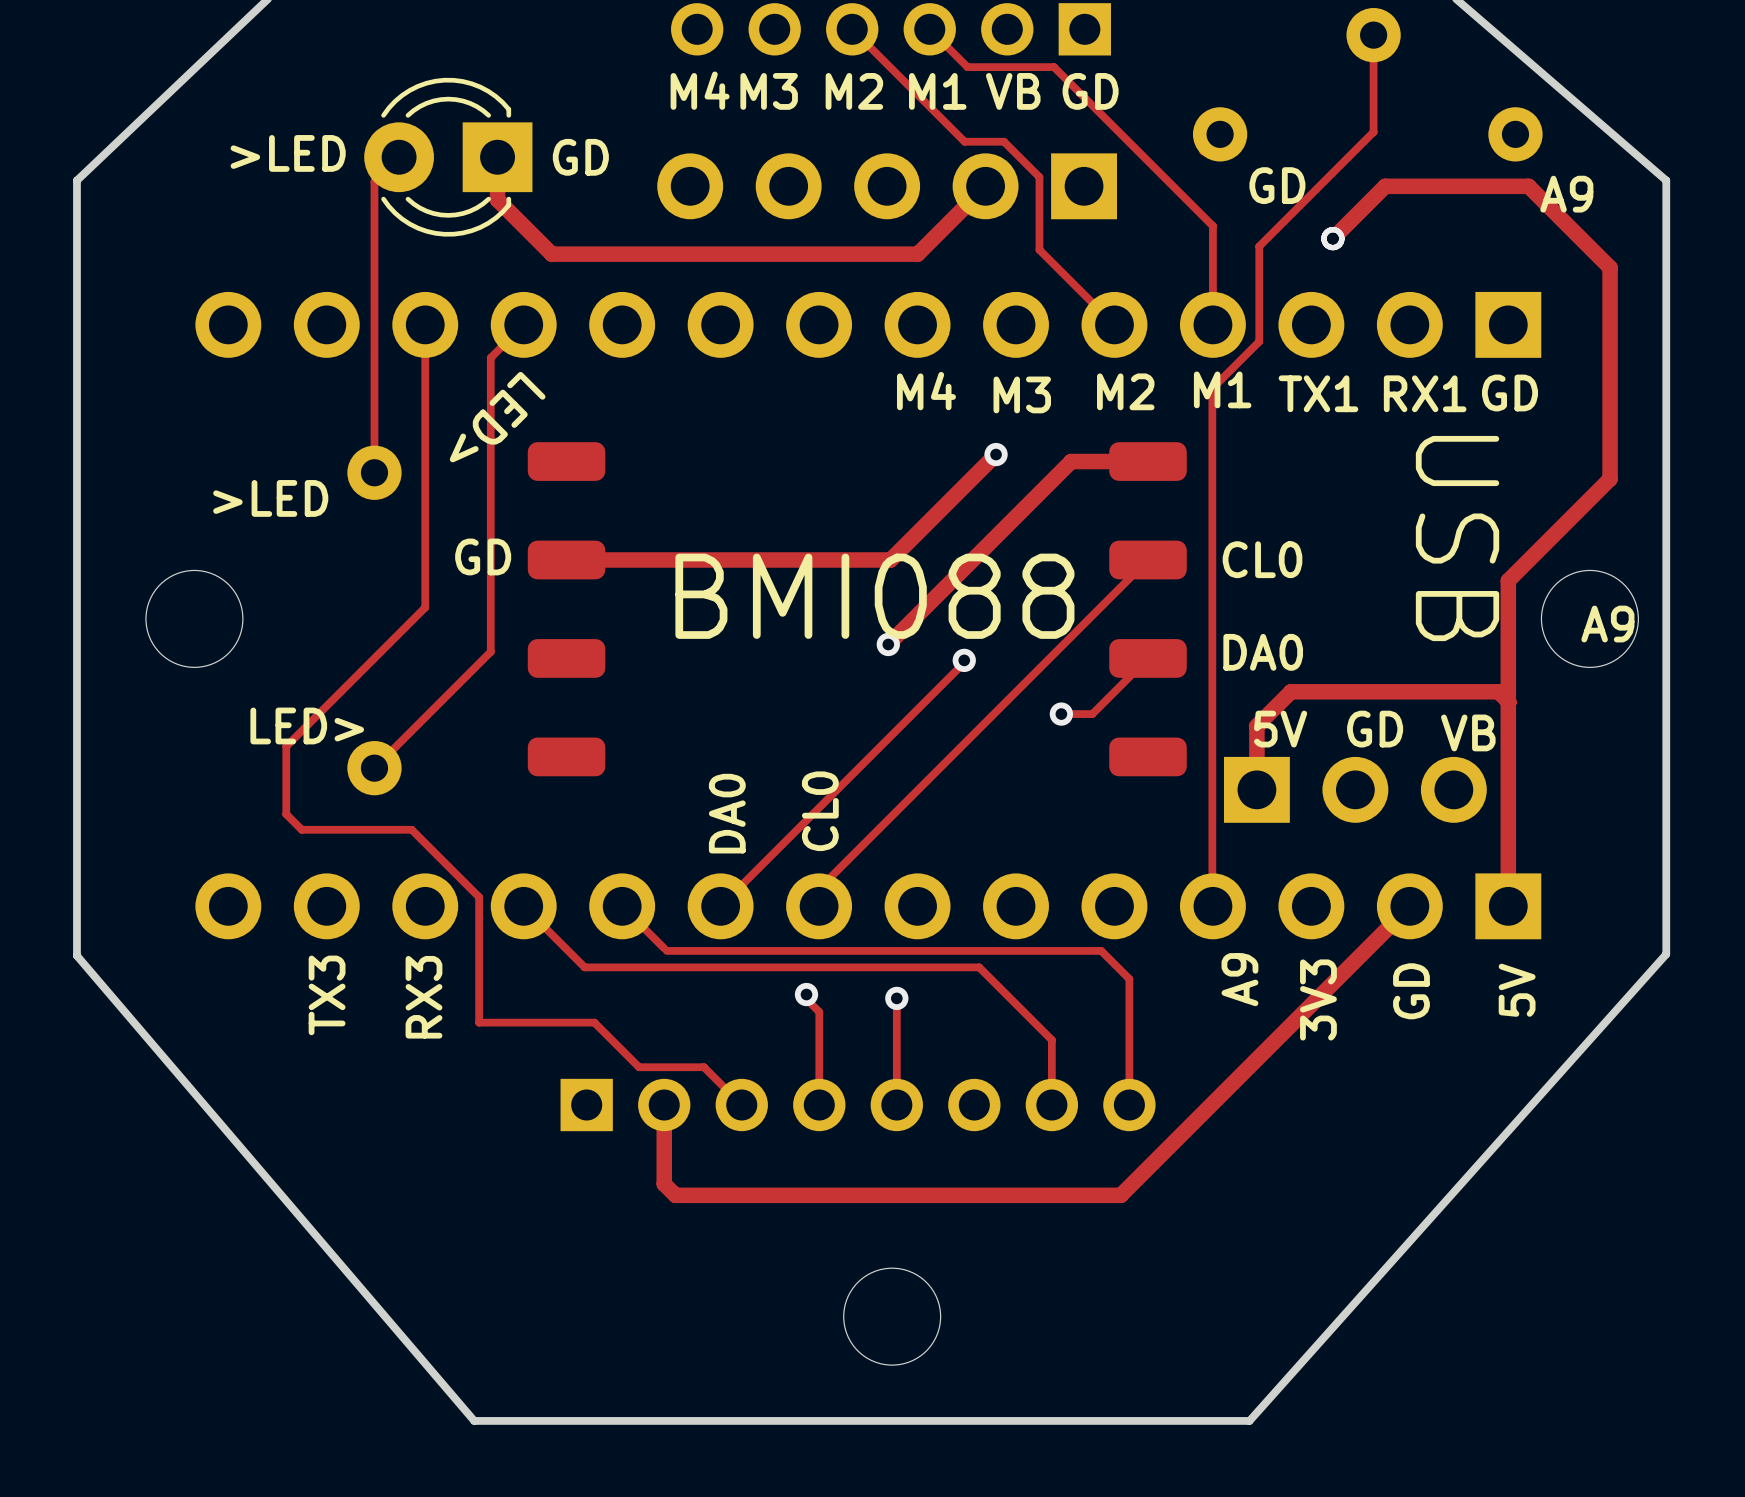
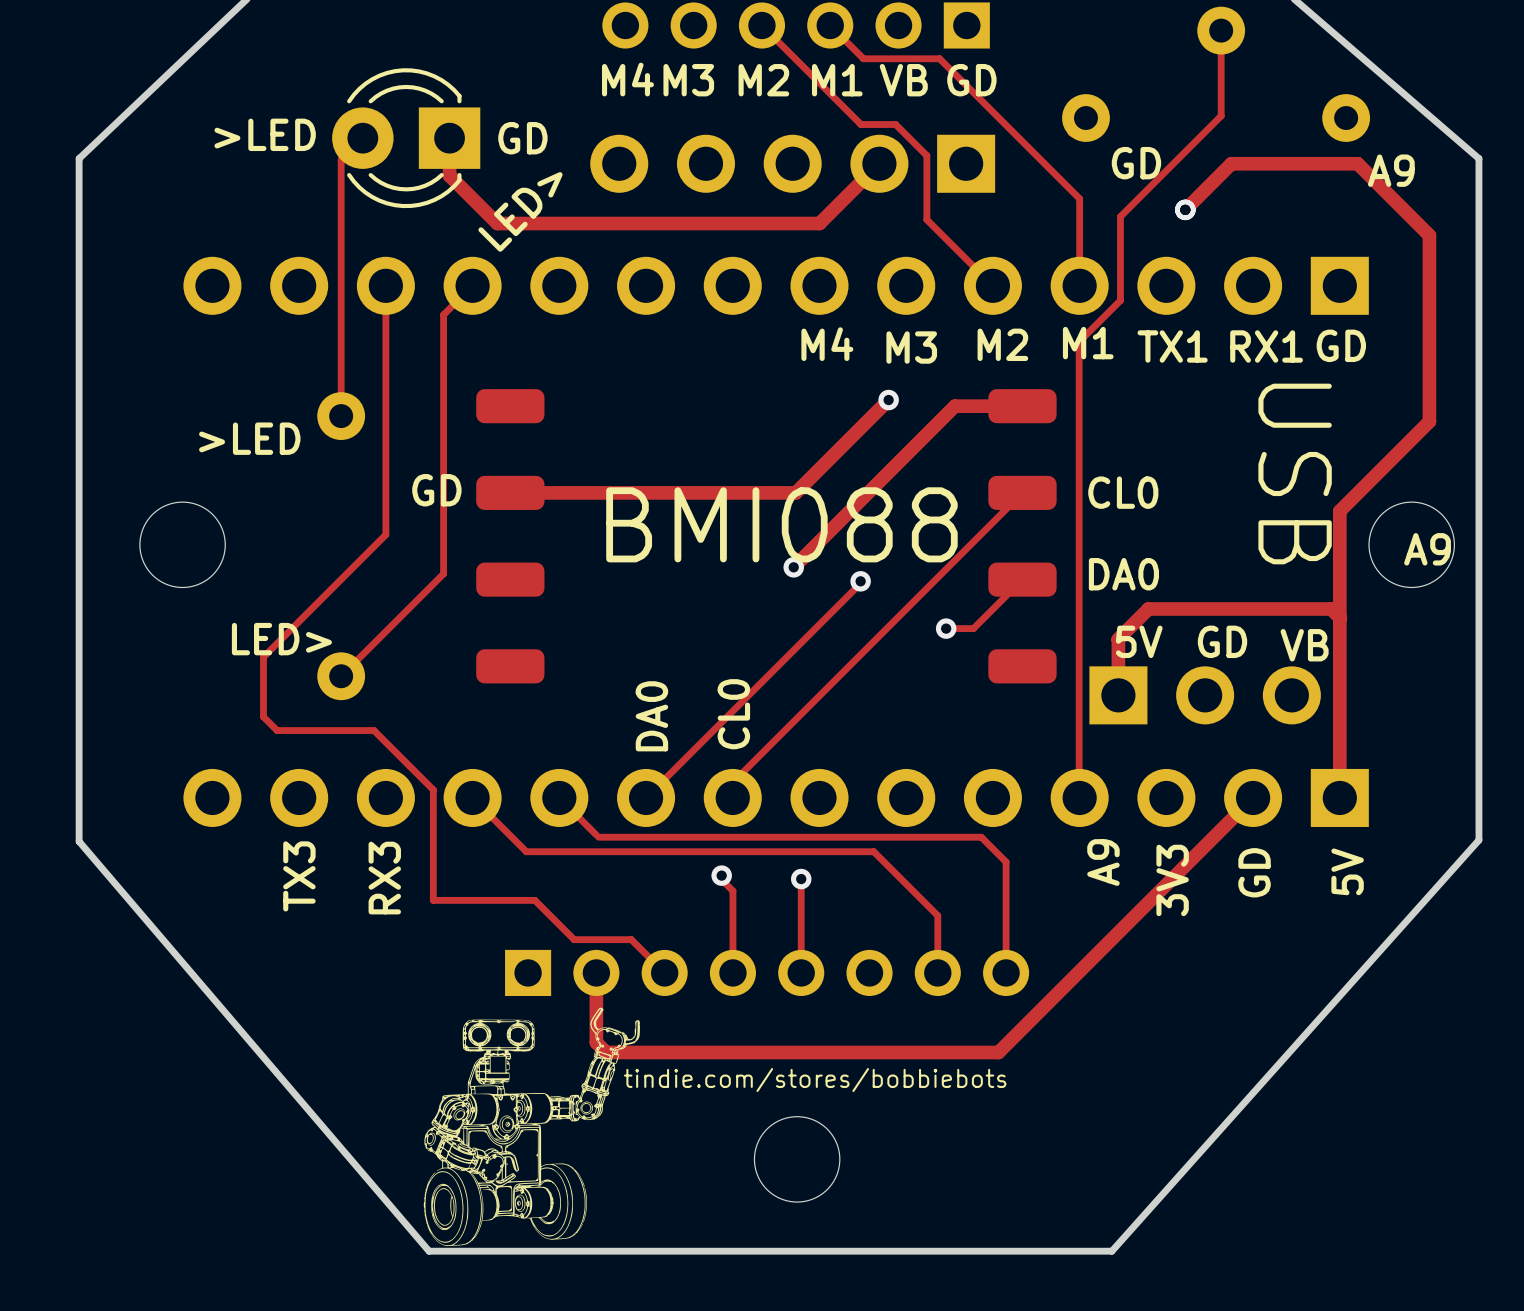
text rotation: 0° (497, 417) -> 180° (520, 211)
text position: LED> (497, 417) -> LED> (520, 211)
drawing: none -> [423, 1007, 640, 1247]
text: none -> tindie.com/stores/bobbiebots (815, 1080)

